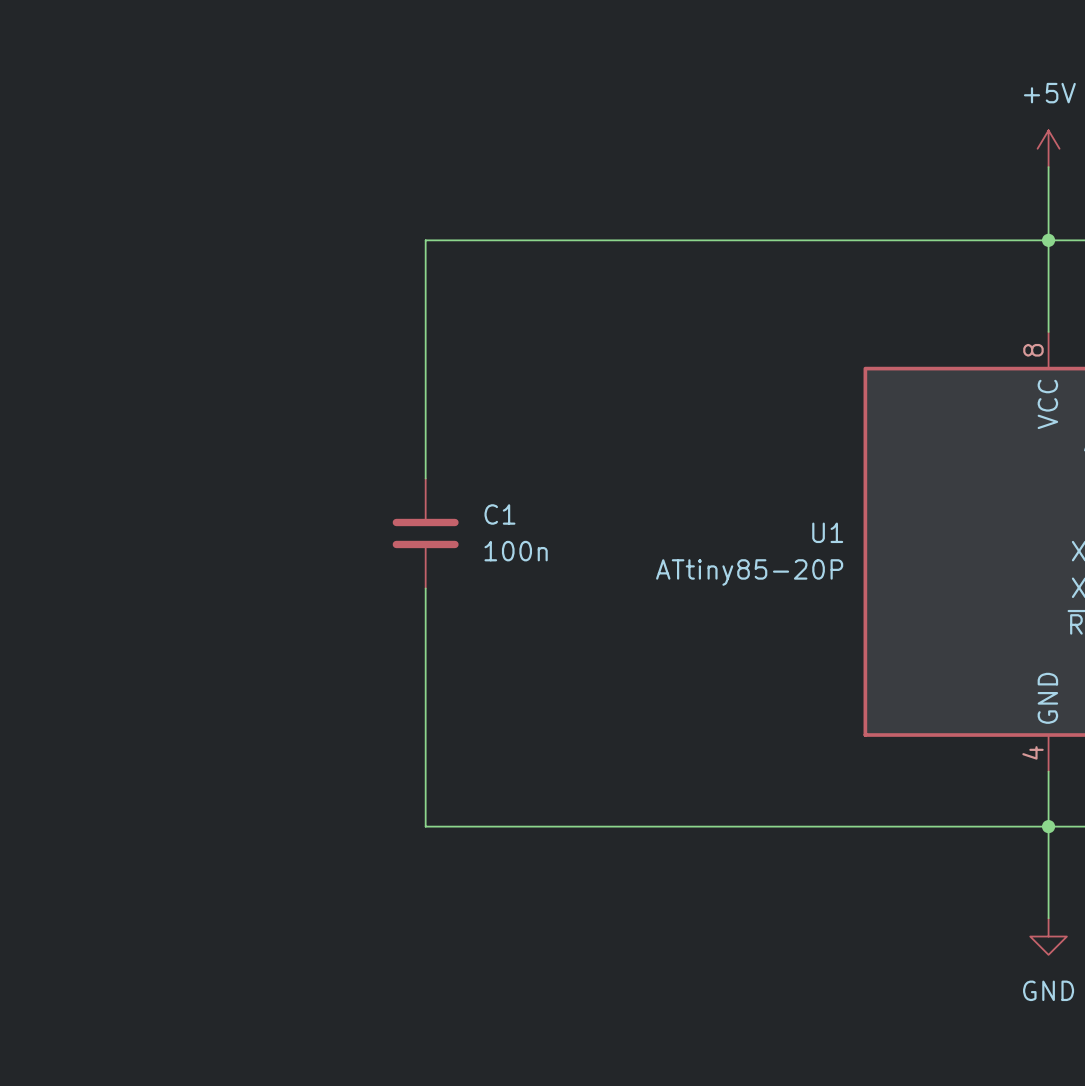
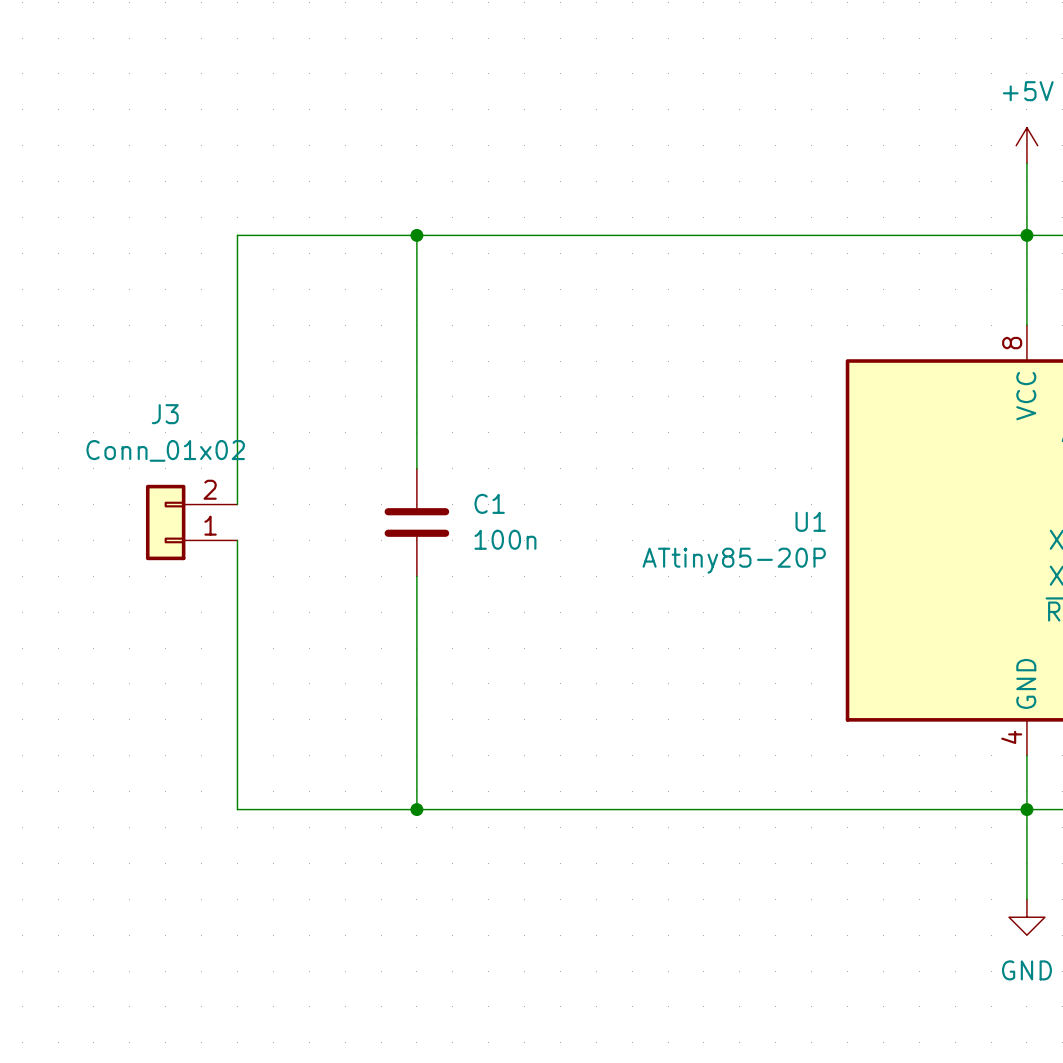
wire: none -> (416, 235) (237, 235) (237, 504)
junction: none -> (416, 235)
J3: none -> Conn_01x02 (191, 522)
wire: none -> (237, 540) (237, 809) (416, 809)
junction: none -> (416, 809)

